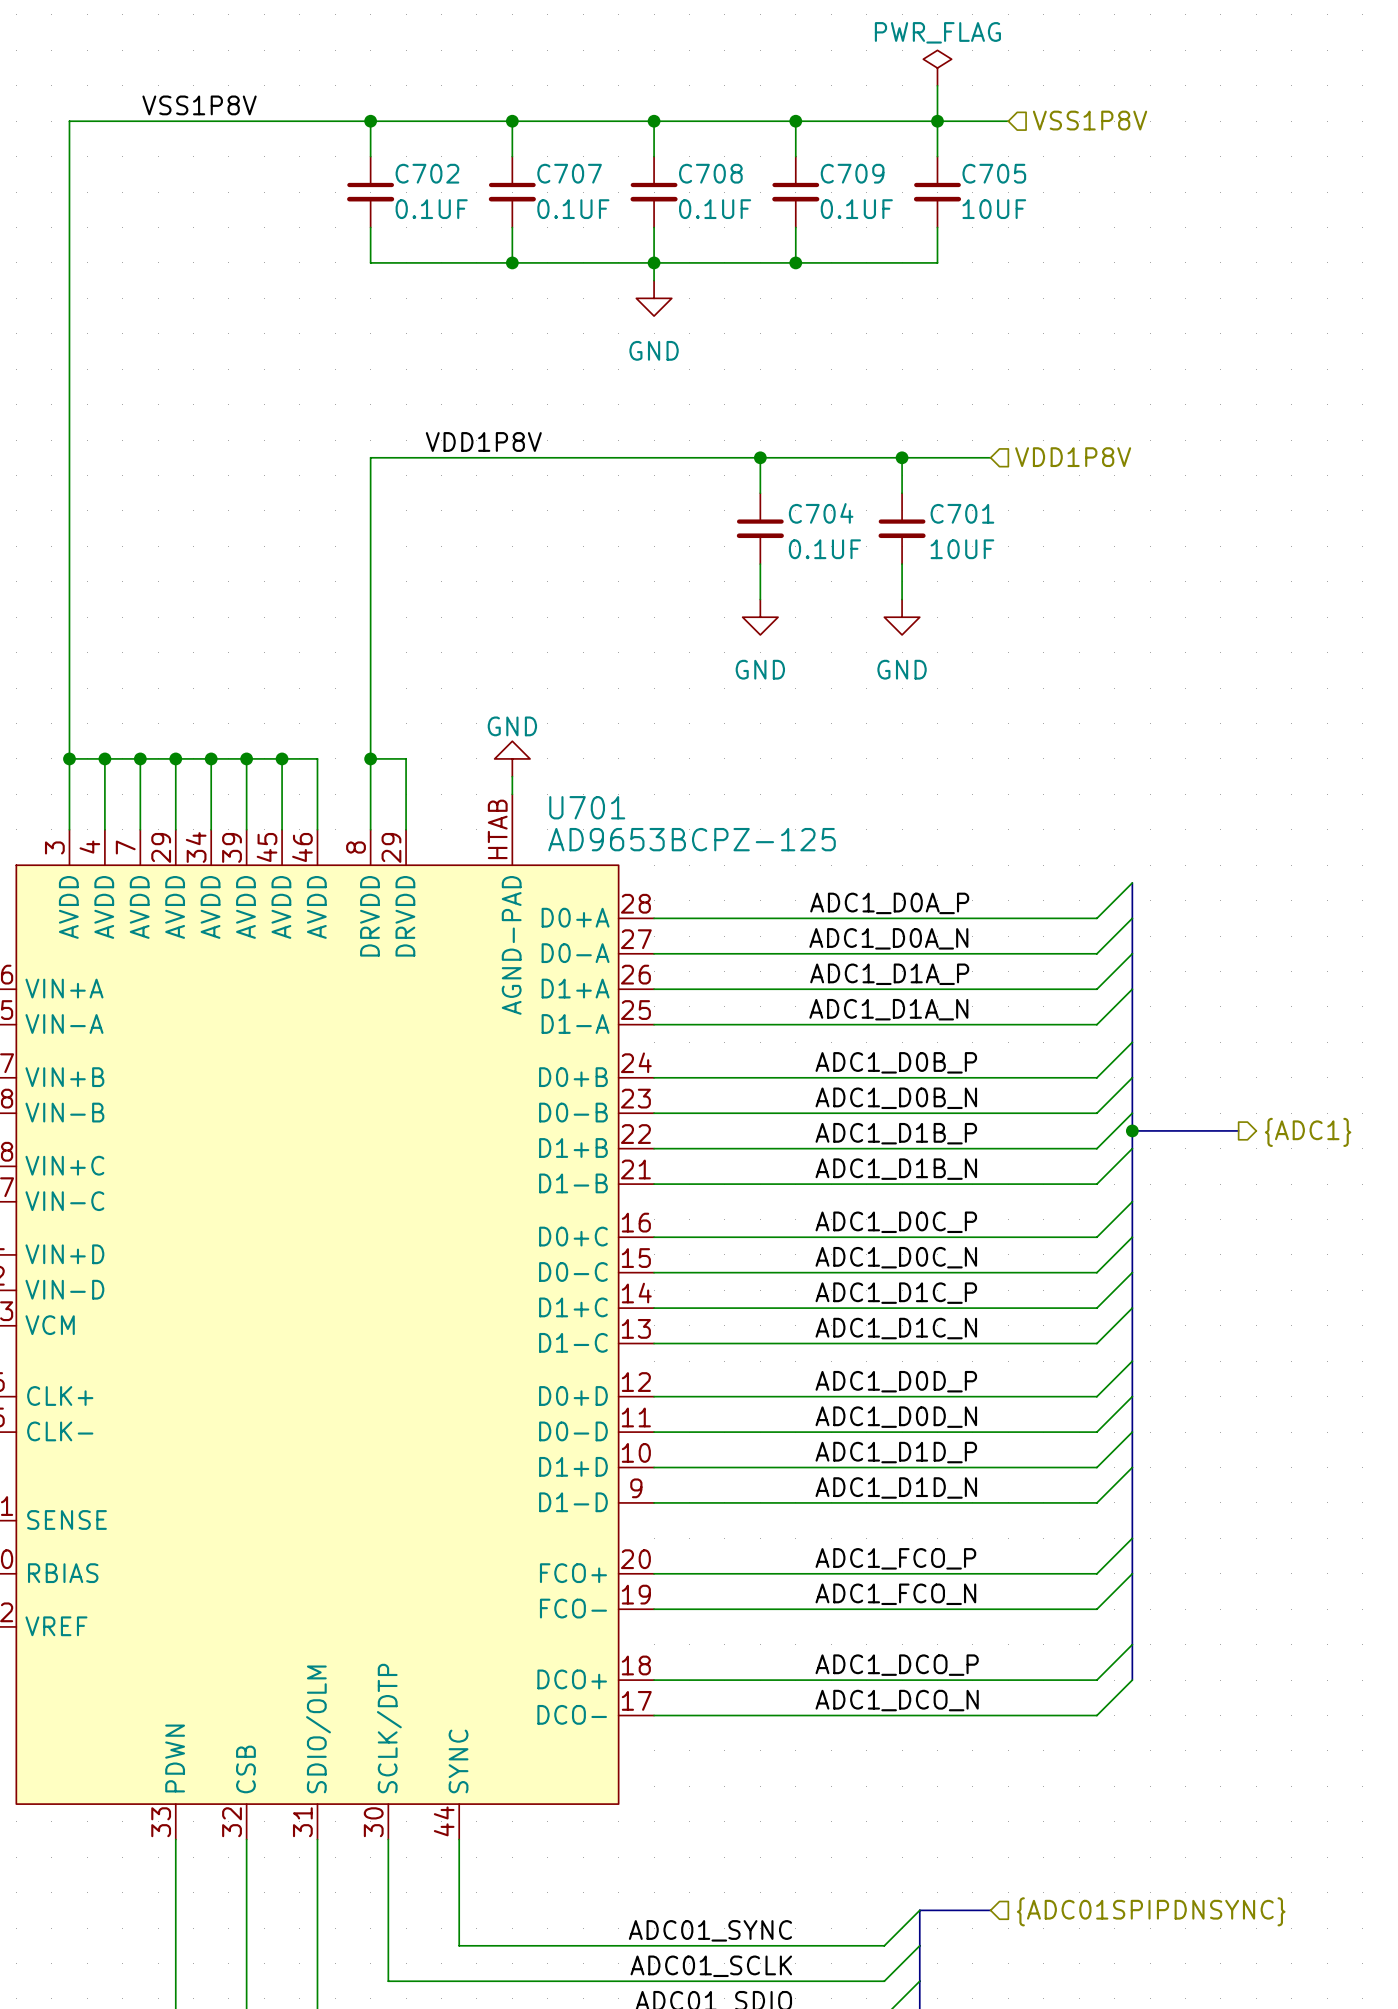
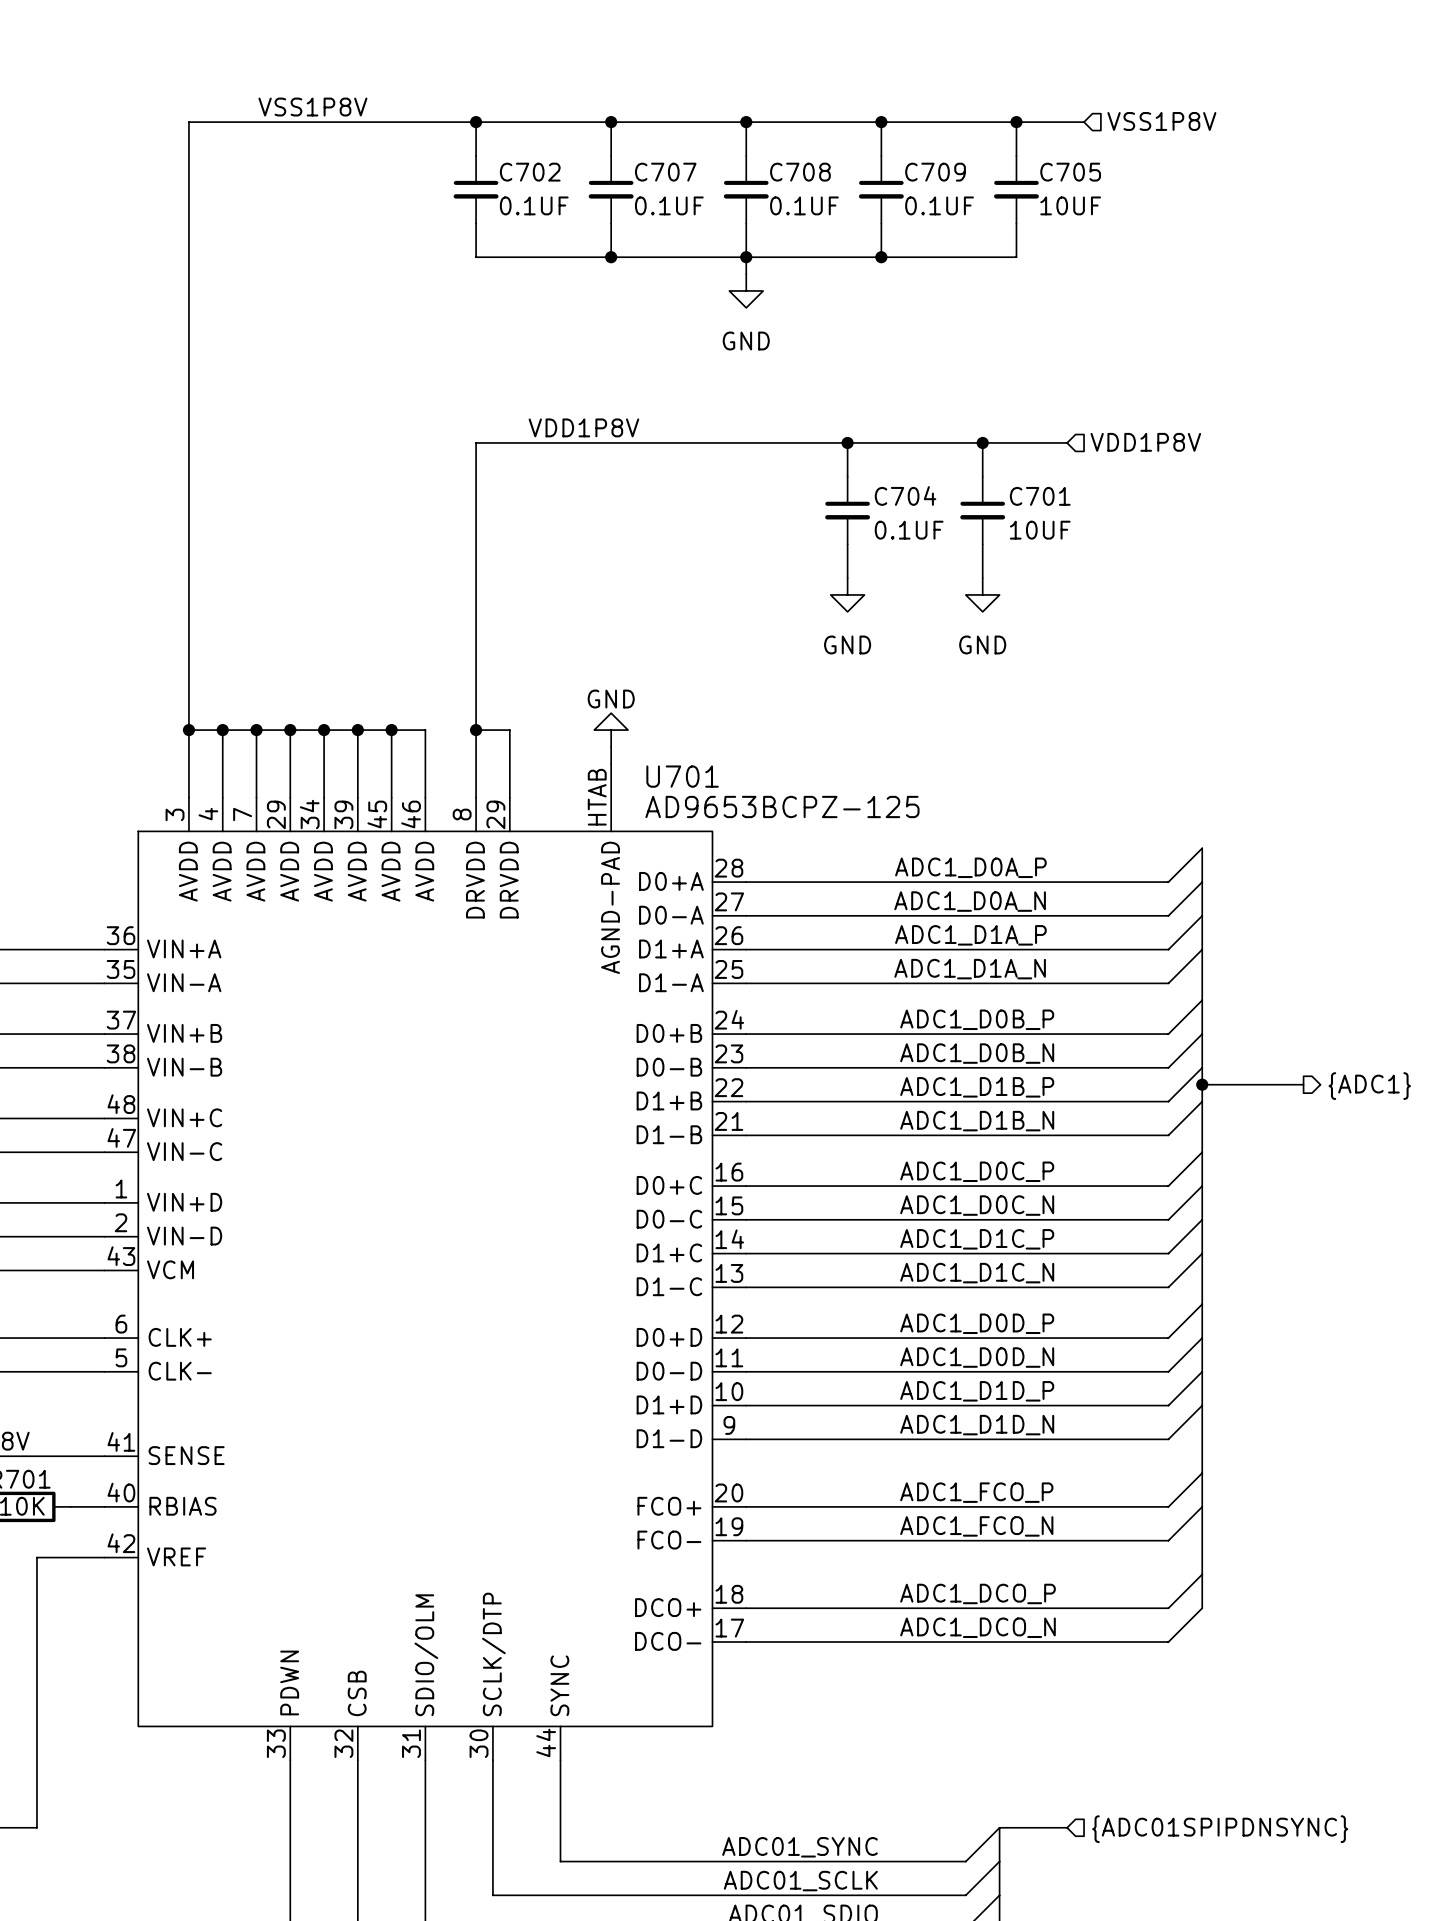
power symbol: PWR_FLAG (937, 68) -> none
wire: (937, 85) (937, 121) -> none

